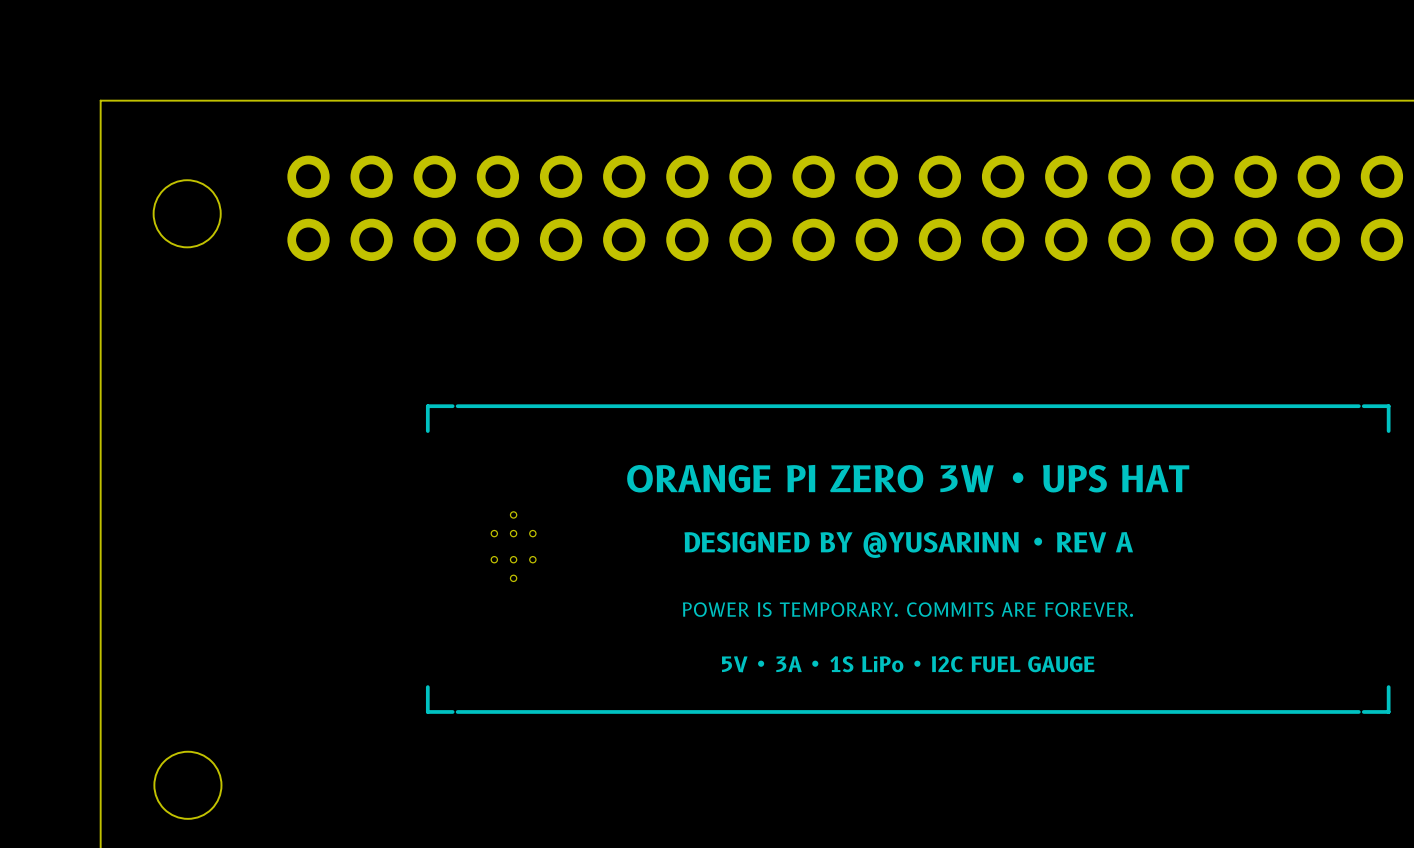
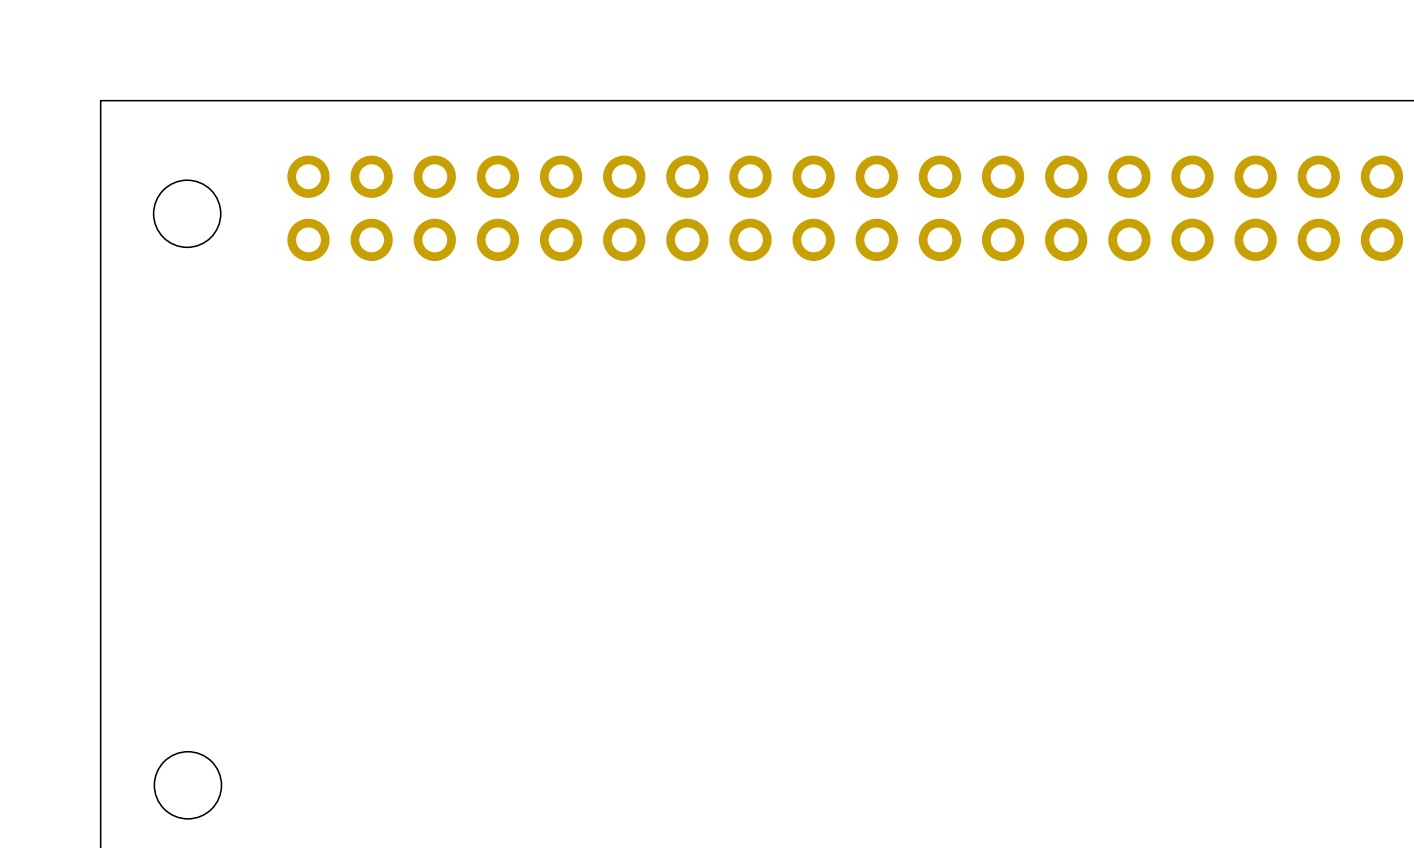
line: (452, 406) (427, 406) (427, 431) -> none
line: (1358, 406) (457, 406) -> none
line: (1363, 406) (1388, 406) (1388, 431) -> none
text: ORANGE PI ZERO 3W • UPS HAT (908, 478) -> none
text: DESIGNED BY @YUSARINN • REV A (908, 544) -> none
part: (513, 546) -> none
text: POWER IS TEMPORARY. COMMITS ARE FOREVER. (907, 609) -> none
text: 5V • 3A • 1S LiPo • I2C FUEL GAUGE (908, 664) -> none
line: (427, 687) (427, 711) (452, 711) -> none
line: (1388, 687) (1388, 711) (1363, 711) -> none
line: (1358, 711) (457, 711) -> none

